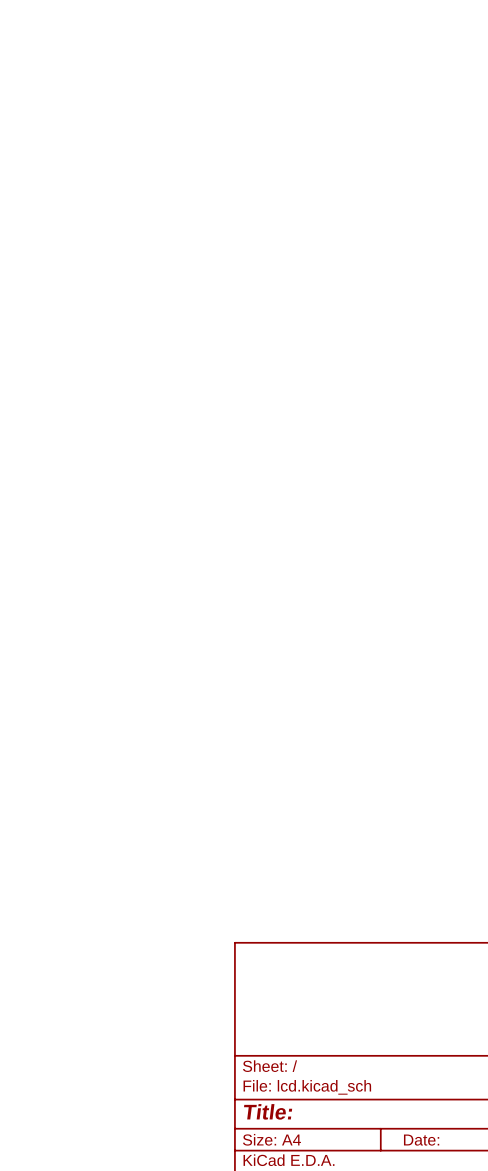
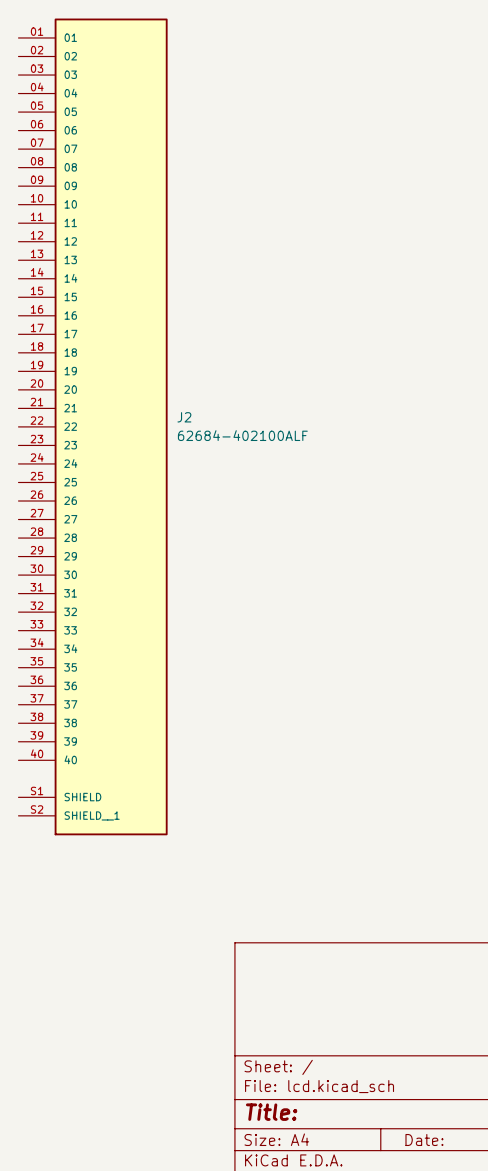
J2: none -> 62684-402100ALF (93, 426)

